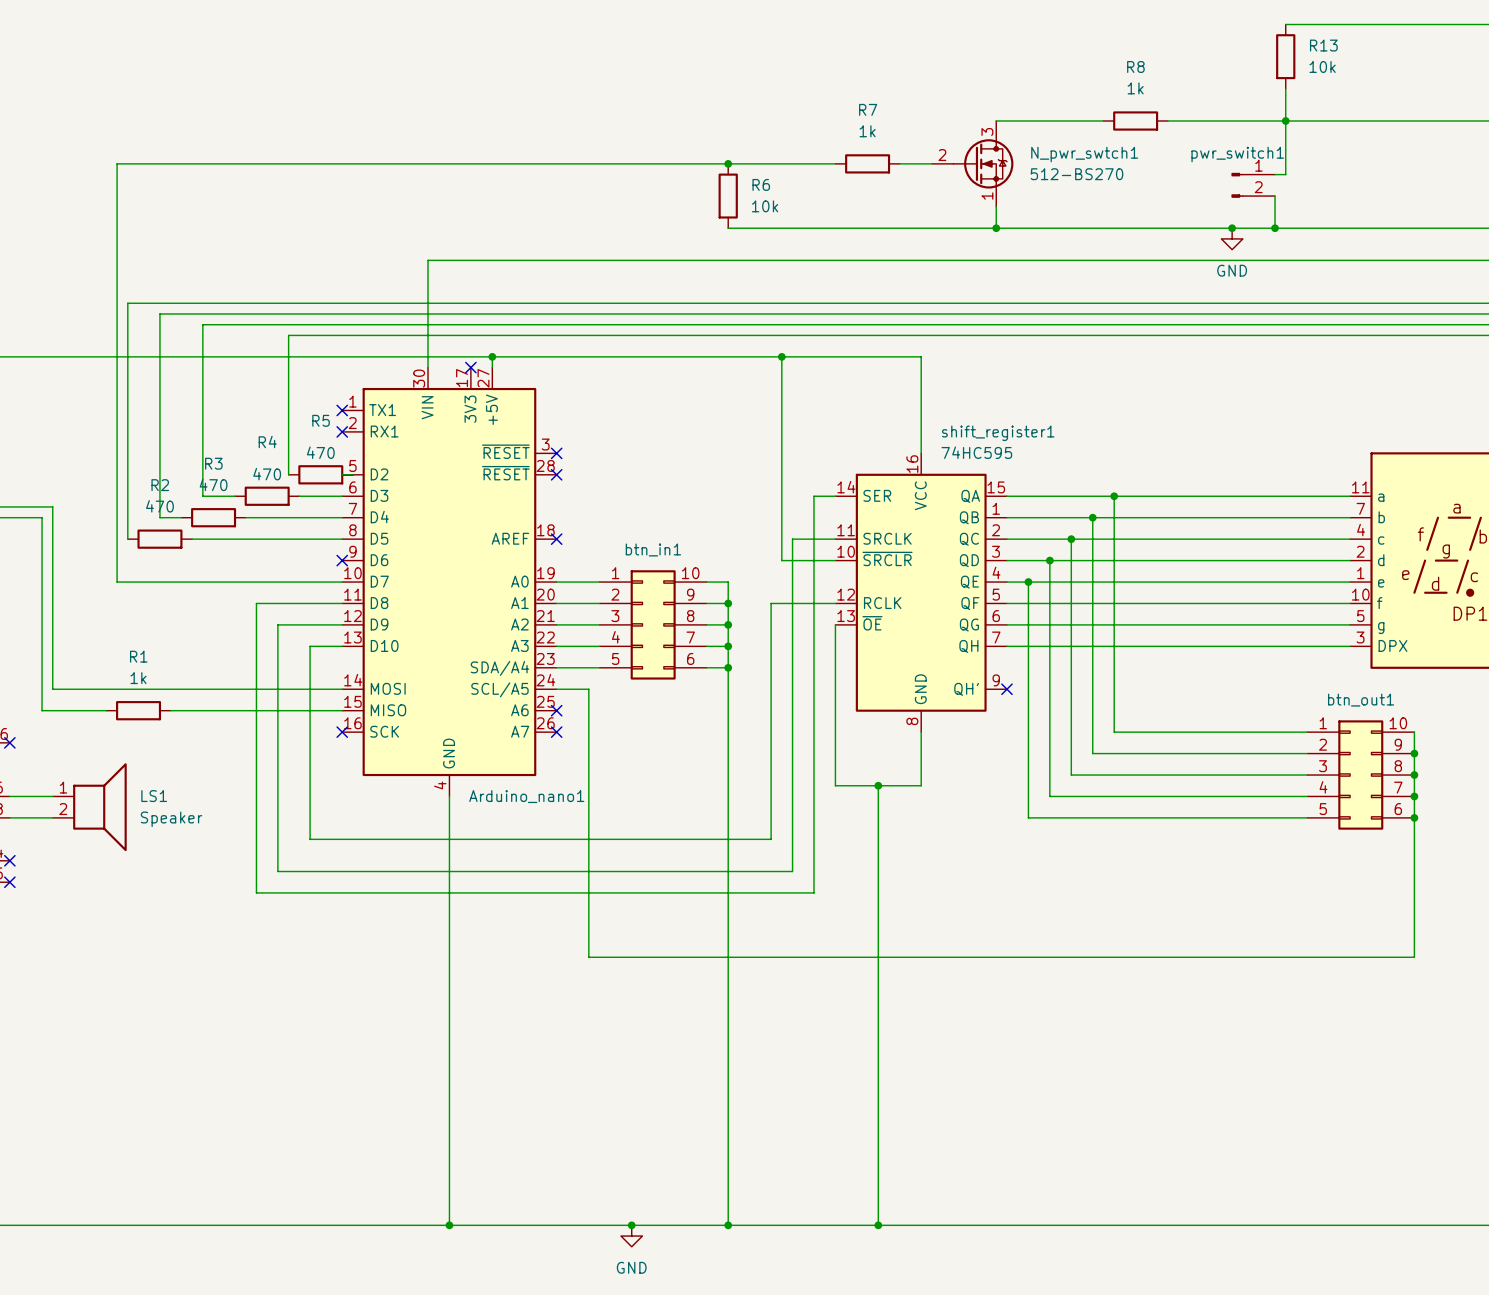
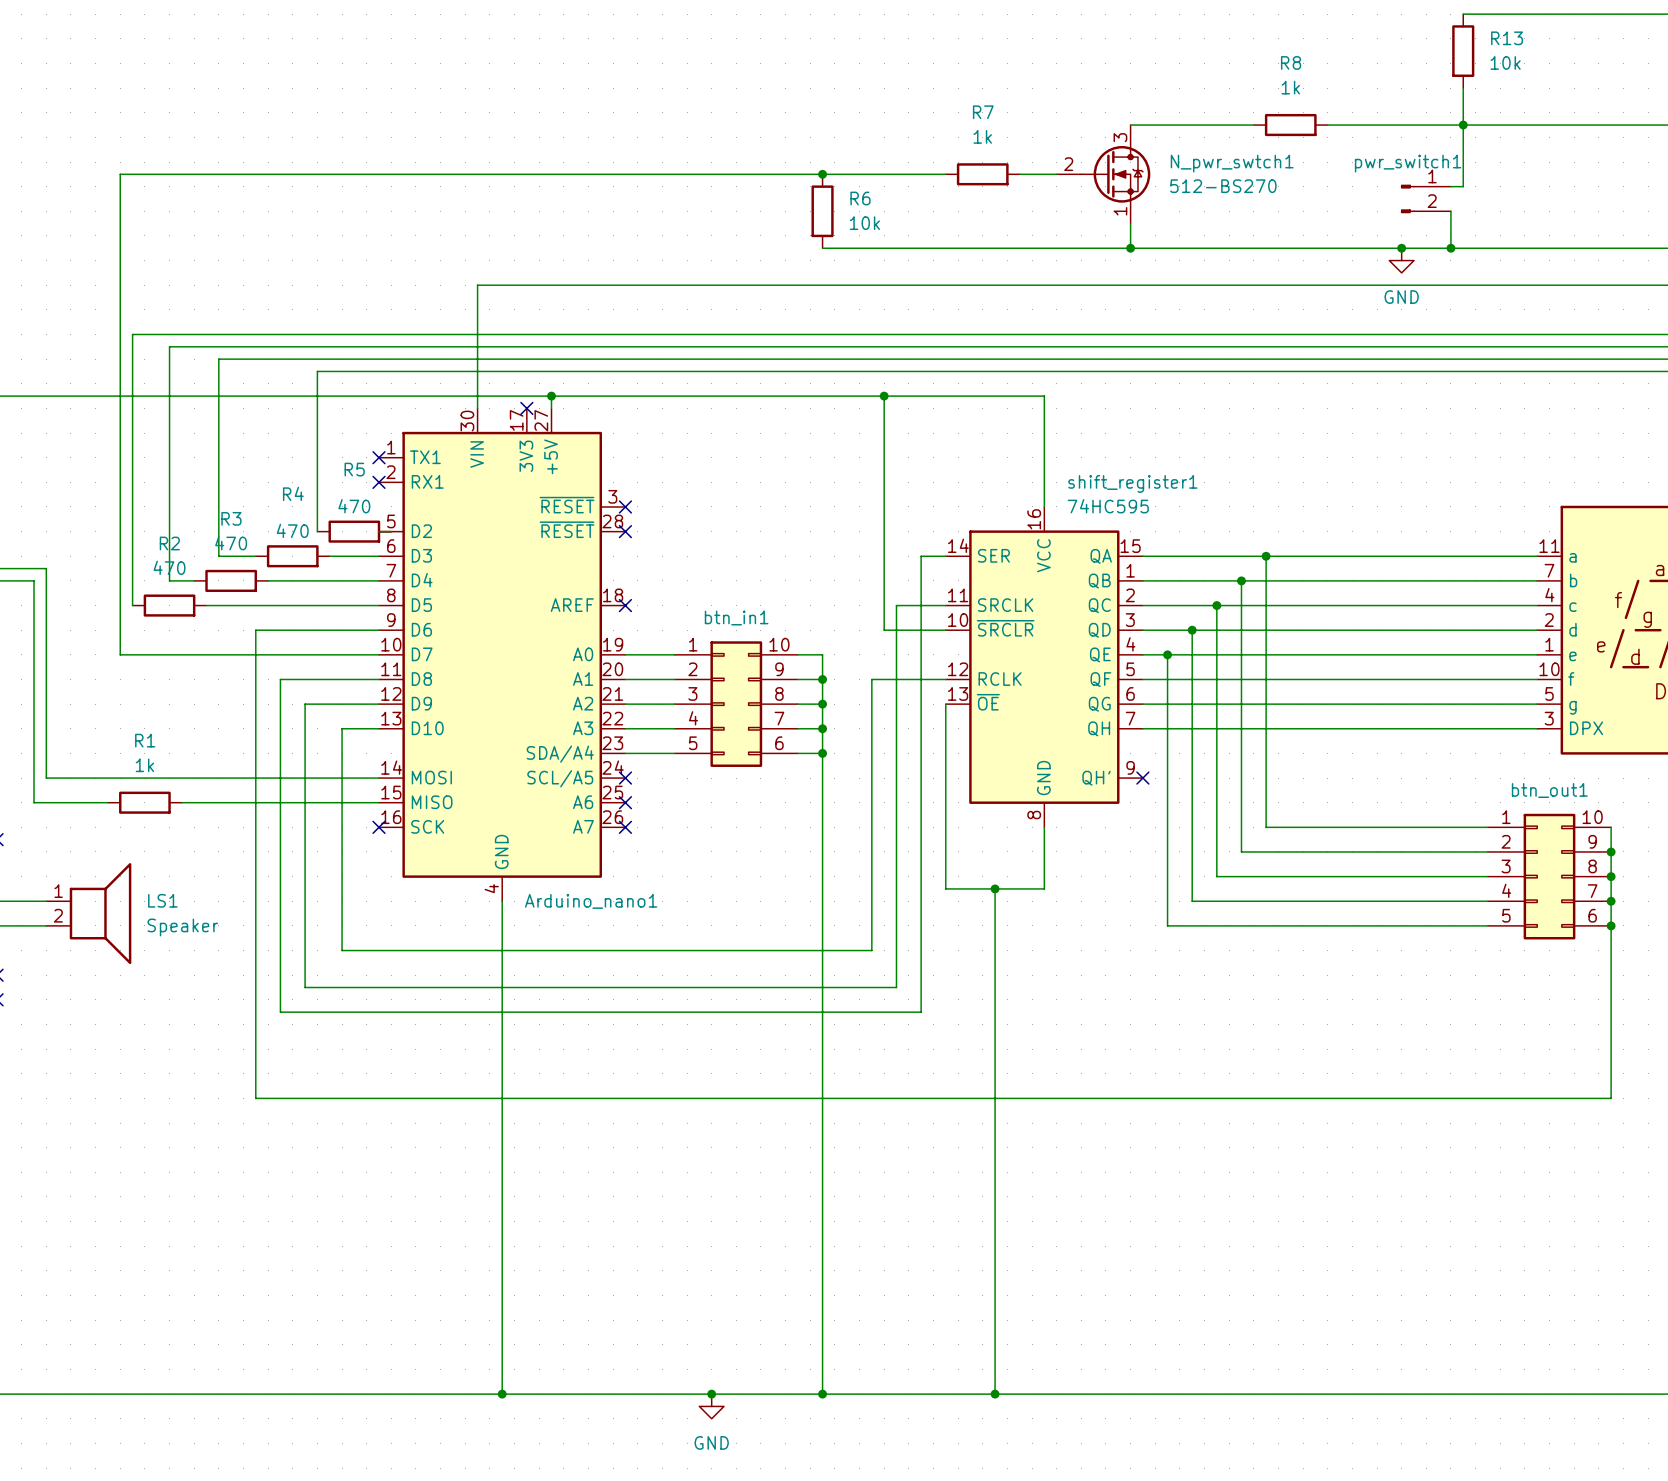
no-connect mark: (342, 560) -> none
wire: (556, 689) (588, 689) (588, 957) (1414, 957) -> (379, 630) (255, 630) (255, 1098) (1611, 1098) (1611, 1086)
no-connect mark: none -> (625, 778)

